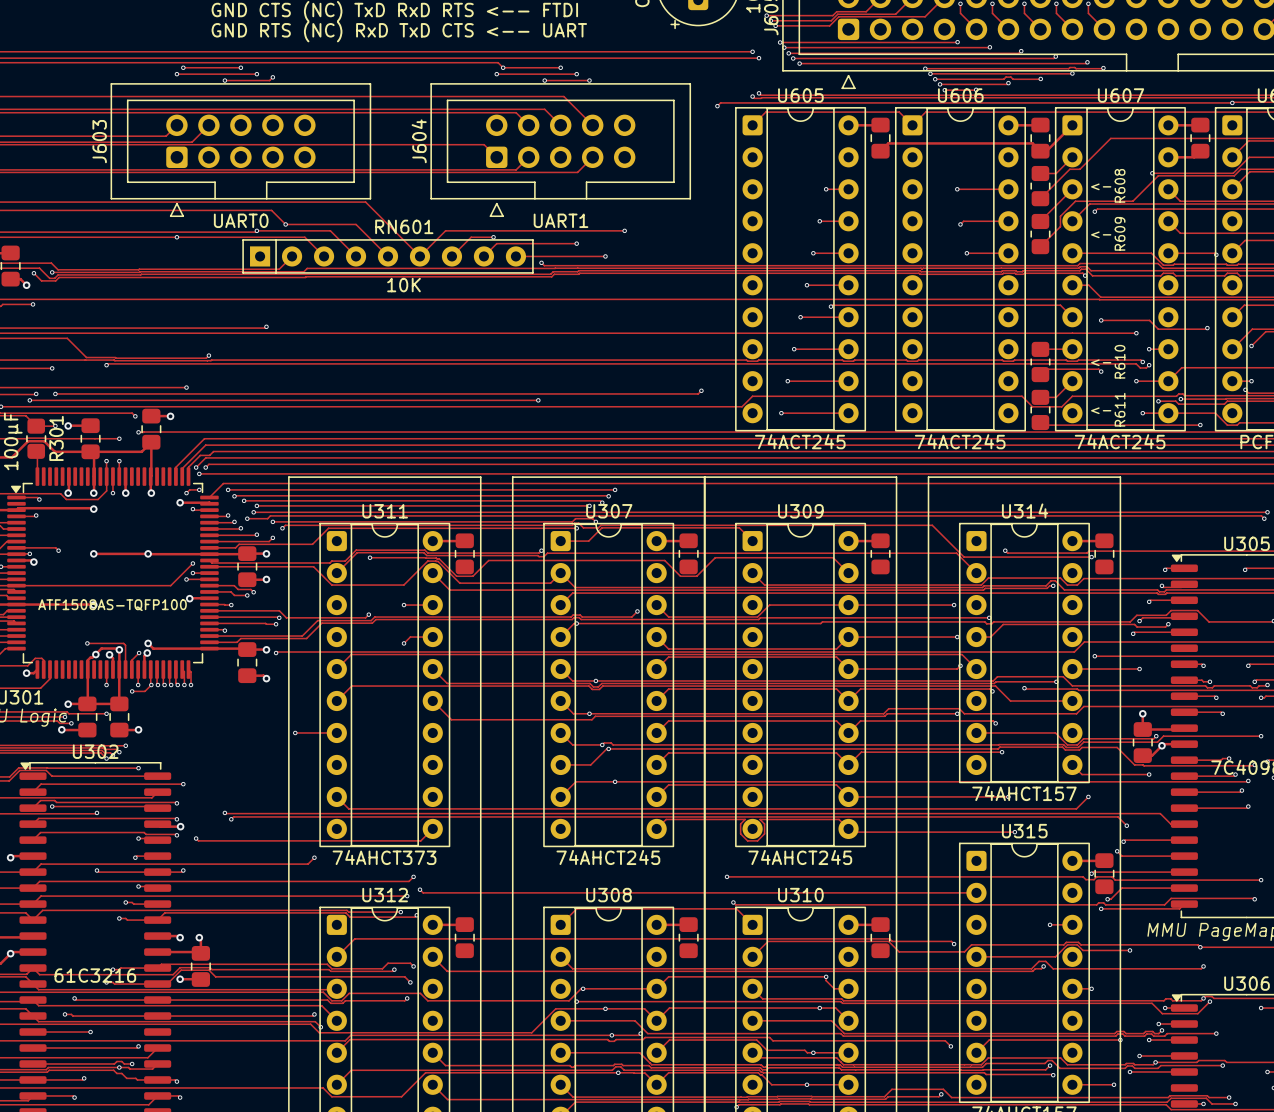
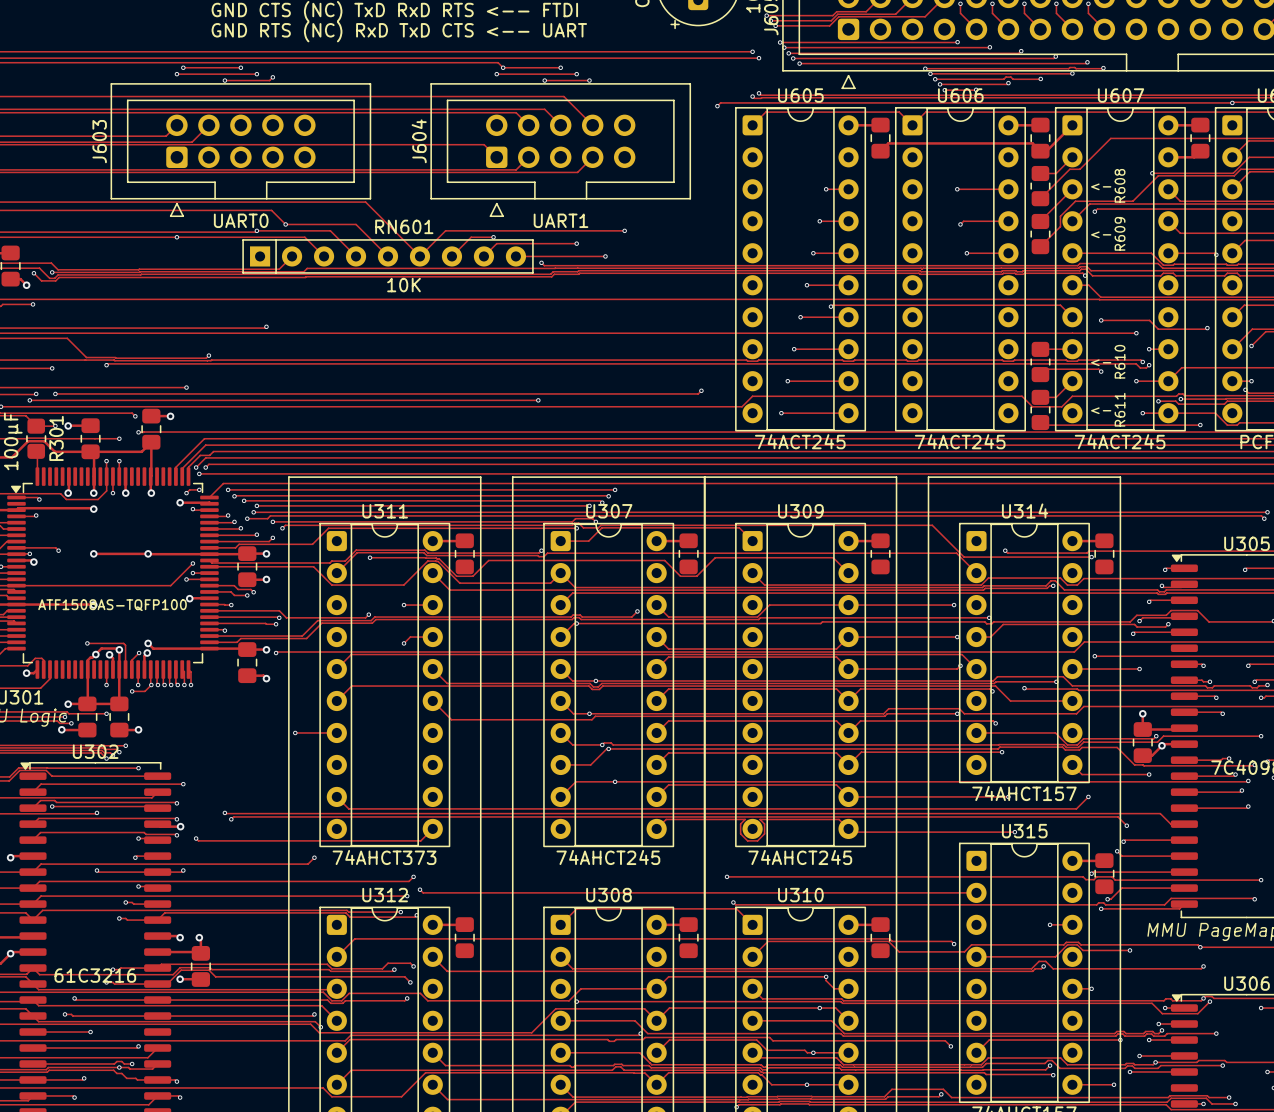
via: (583, 988) -> none
via: (605, 1008) -> none
via: (611, 1035) -> none
via: (618, 1072) -> none

